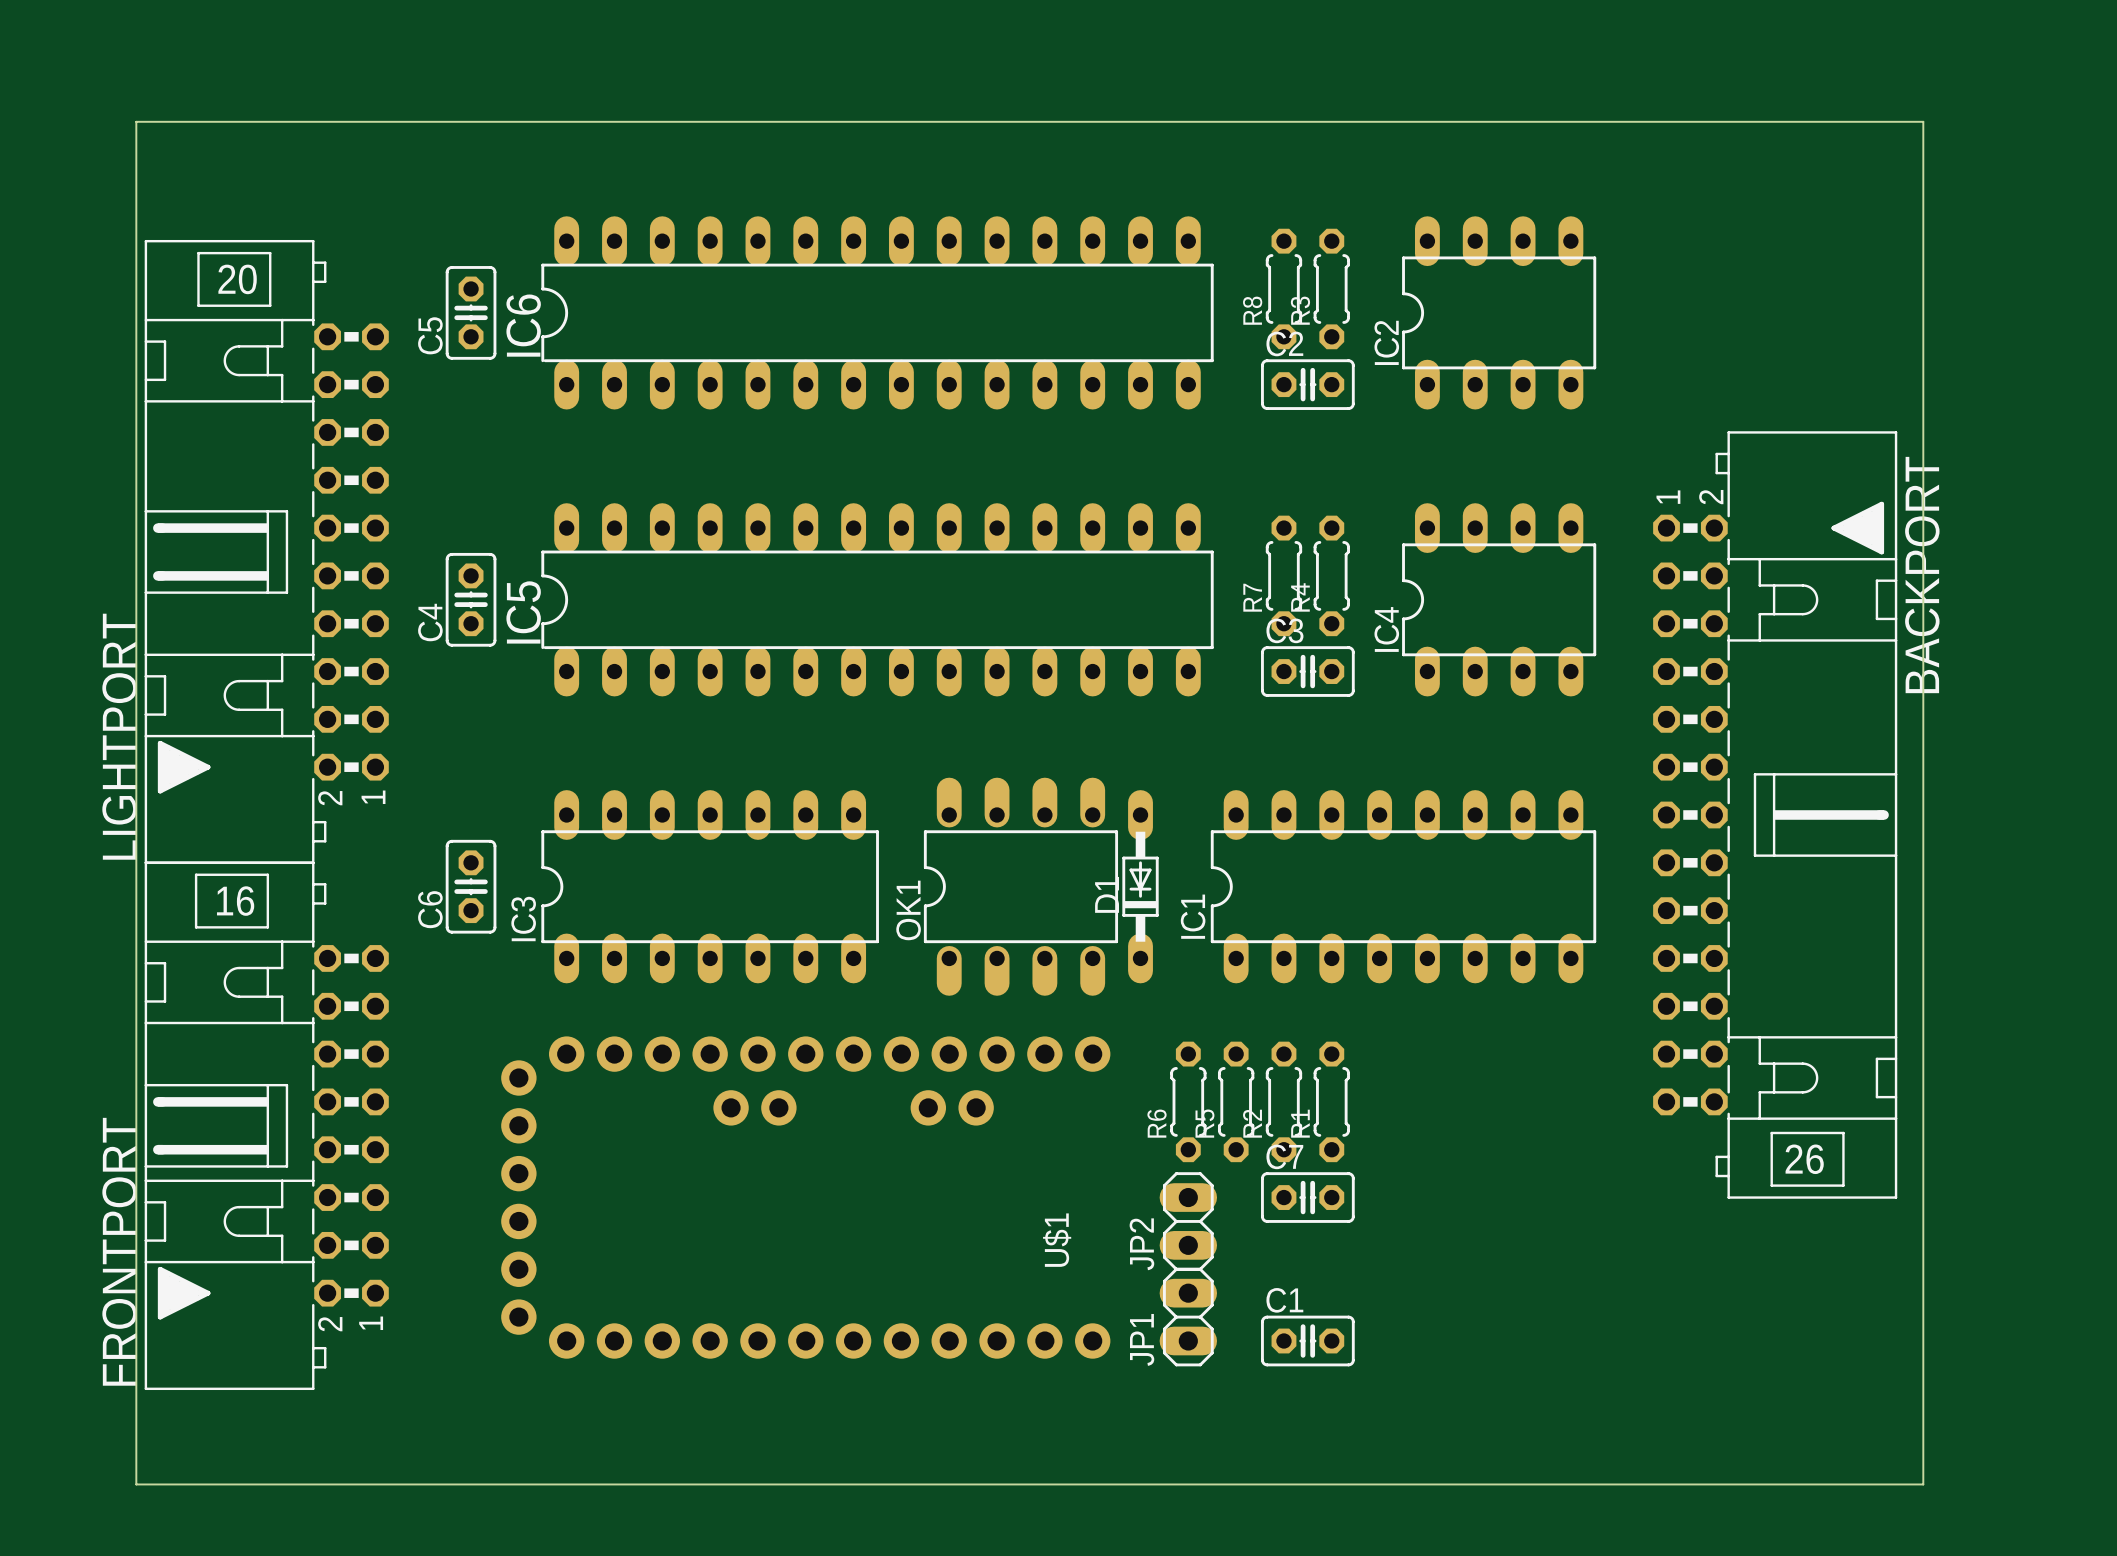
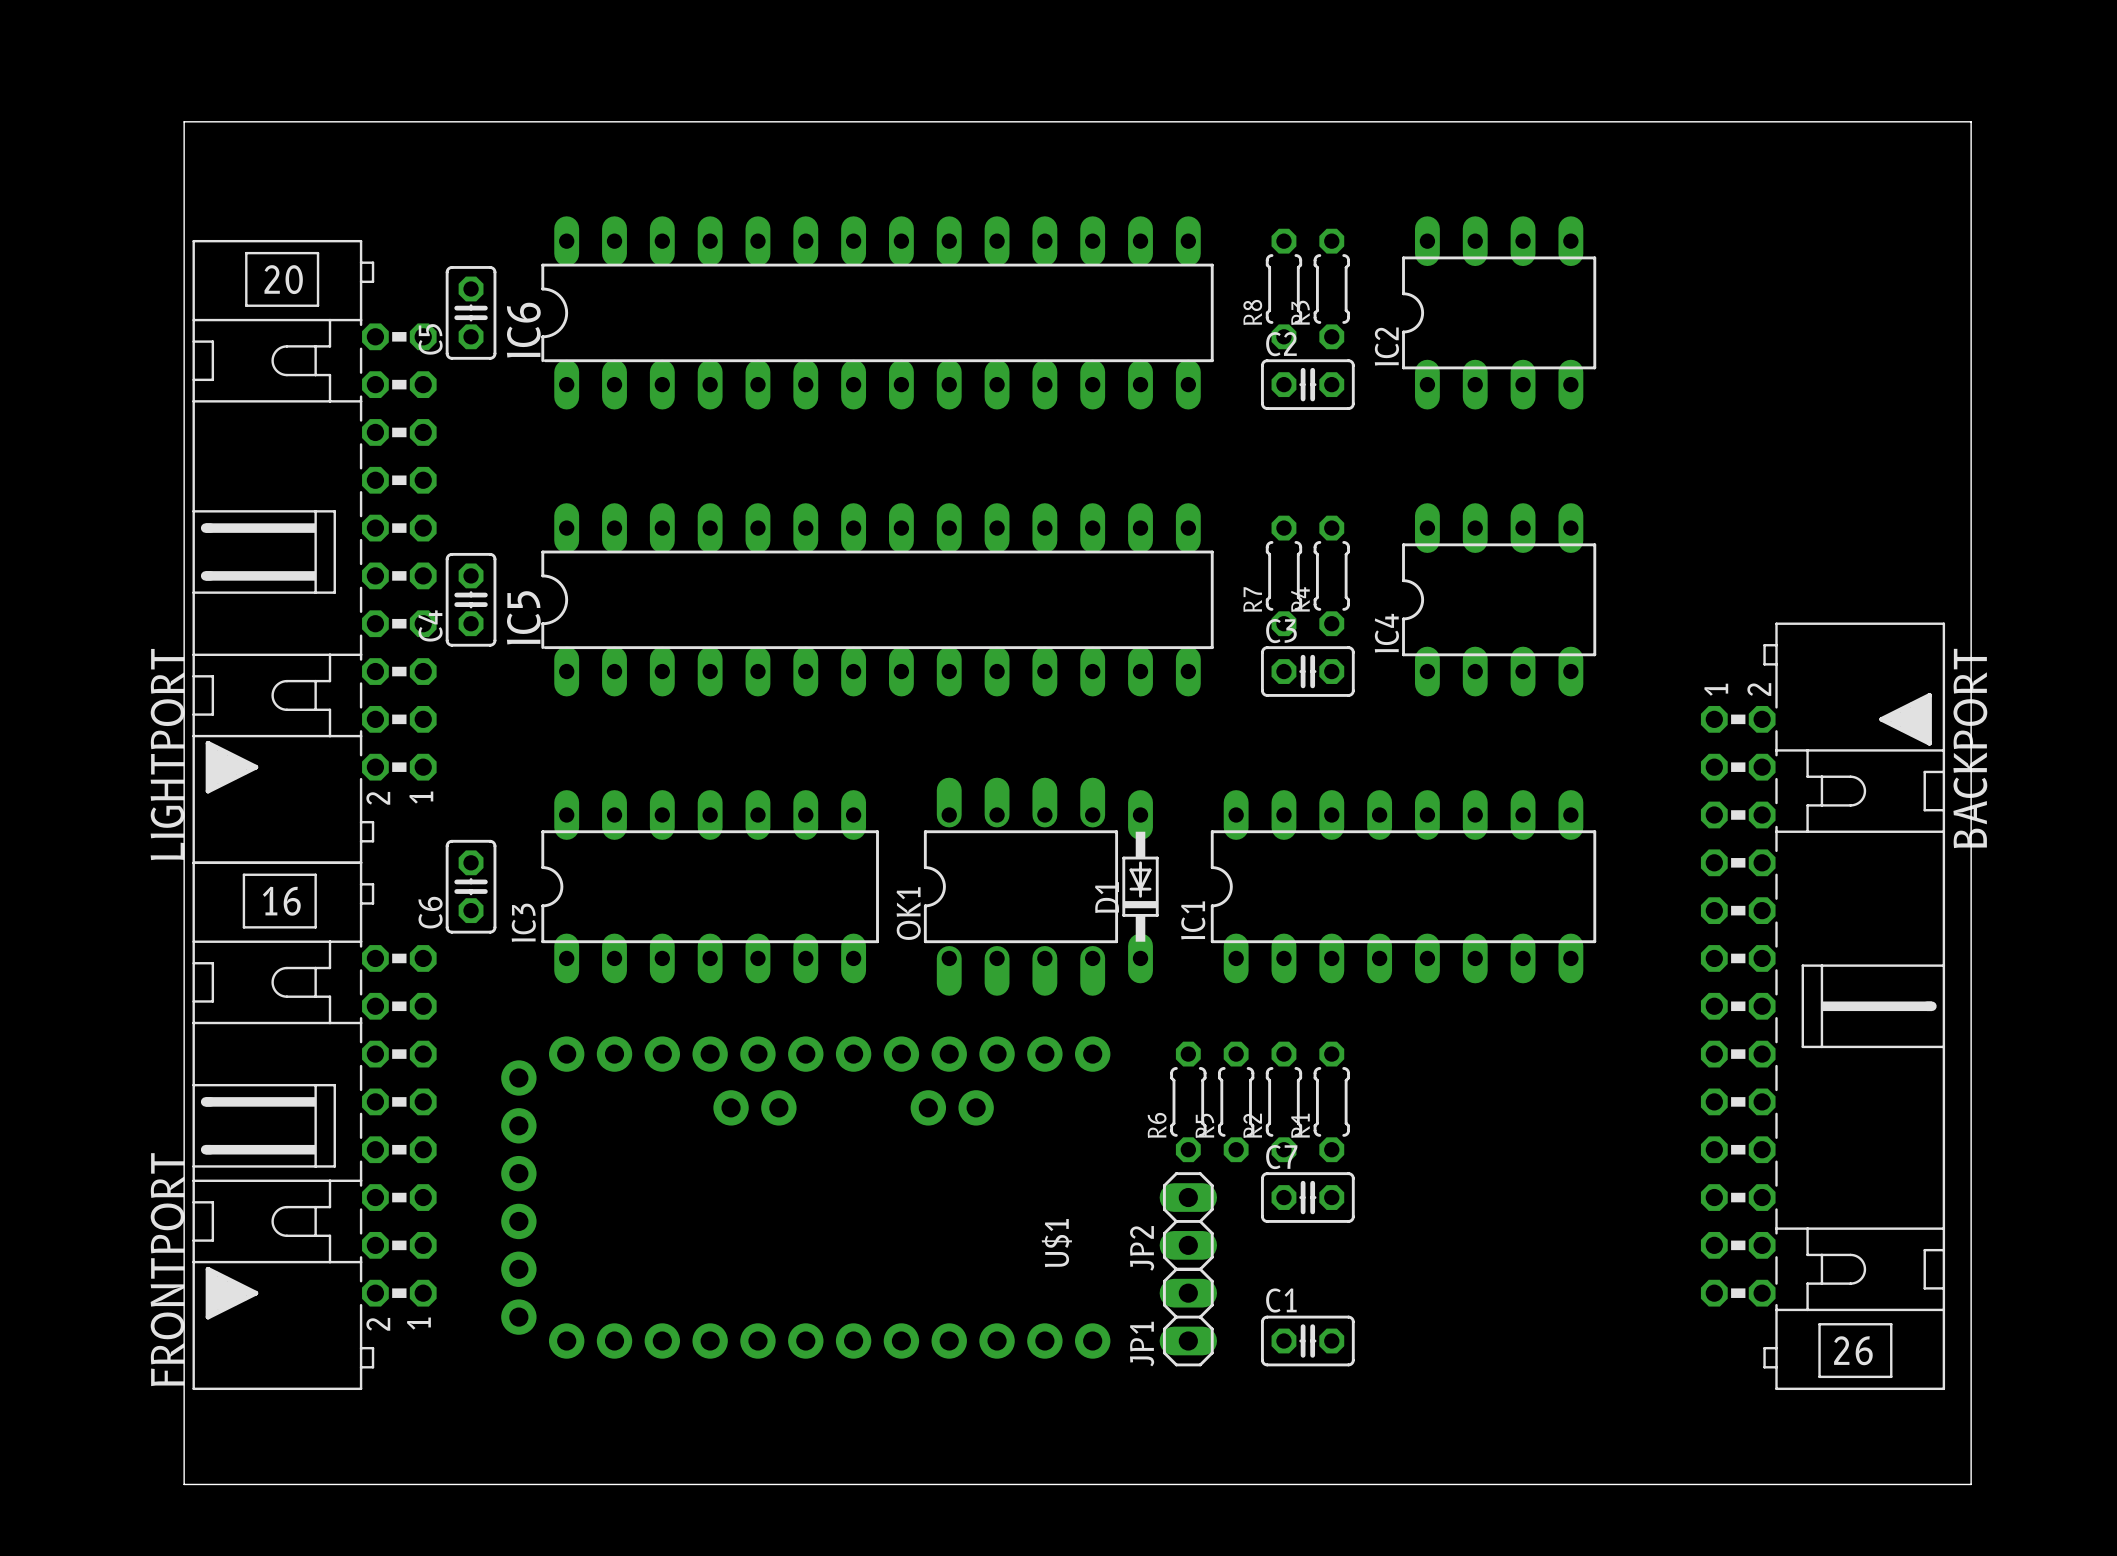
board edge: (184, 121) (136, 121) (136, 1484) (184, 1484) -> (184, 121) (184, 1484)
board edge: (1923, 121) (1923, 1484) -> (1923, 121) (1971, 121) (1971, 1484) (1923, 1484)
LIGHTPORT position: (266, 551) -> (314, 551)
BACKPORT position: (1775, 814) -> (1823, 1006)
FRONTPORT position: (266, 1125) -> (314, 1125)

